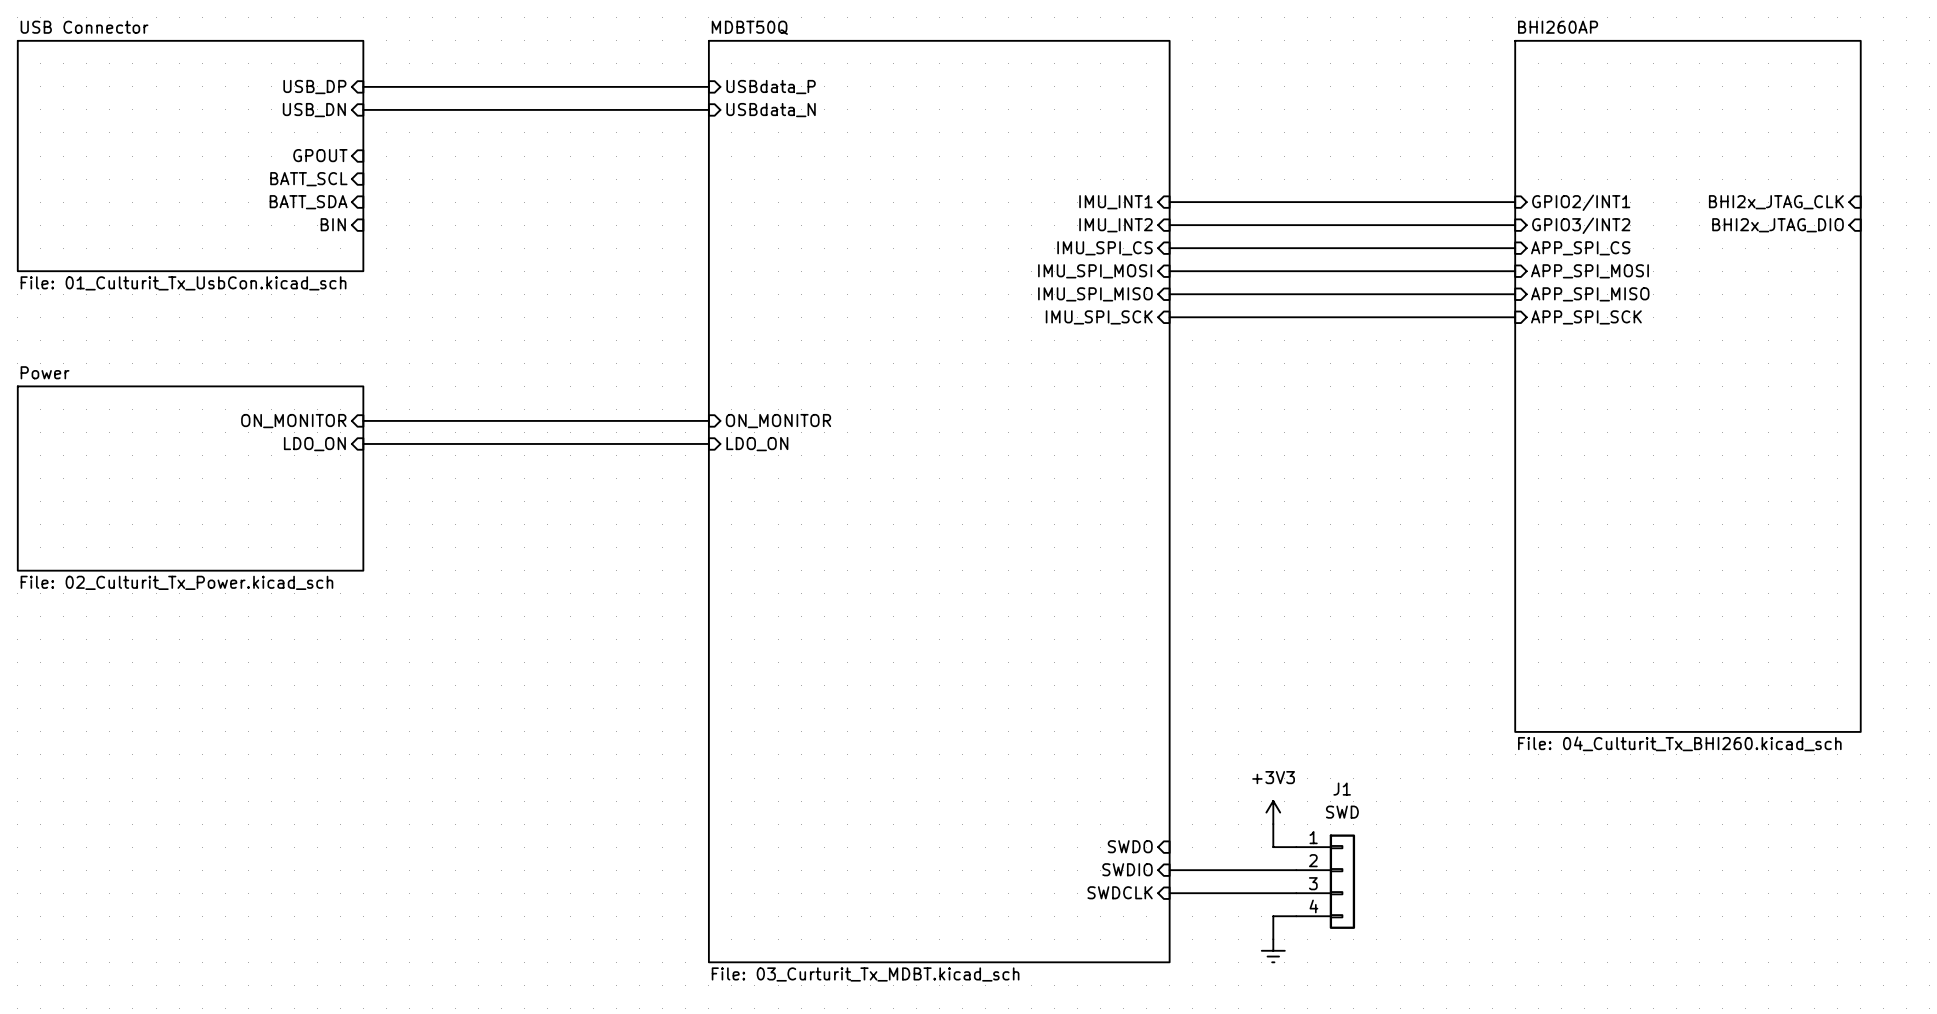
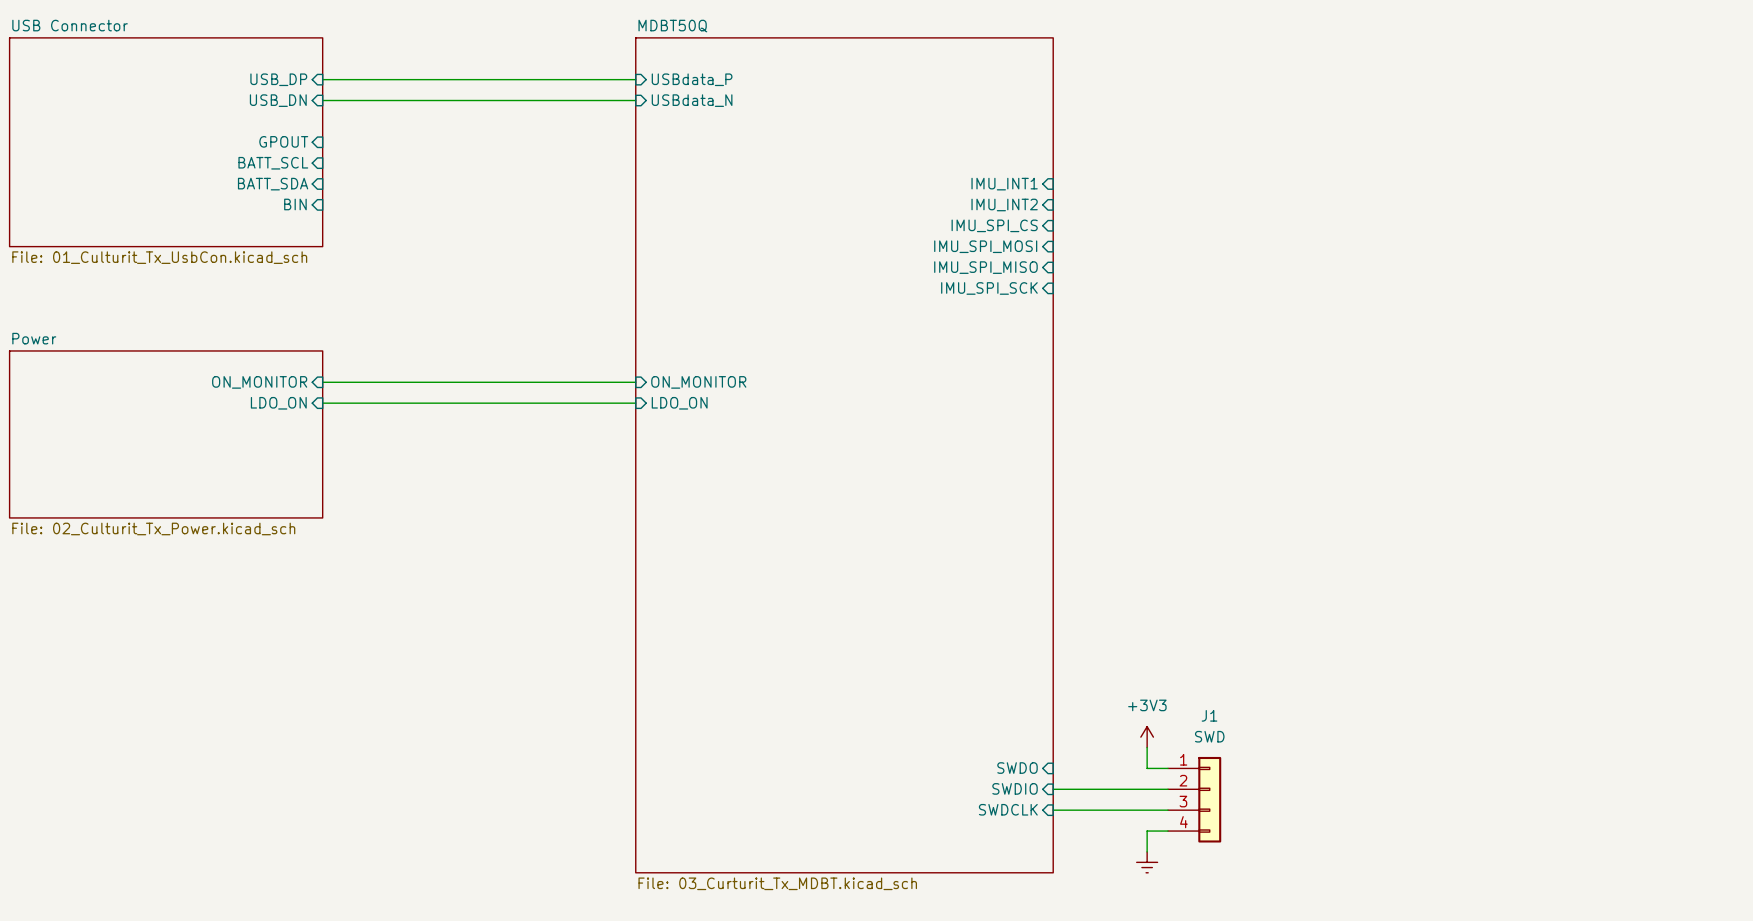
wire: (1169, 202) (1515, 202) -> none
sheet pin: GPIO2/INT1 (1581, 202) -> none
sheet pin: BHI2x_JTAG_CLK (1776, 202) -> none
wire: (1169, 225) (1515, 225) -> none
sheet pin: GPIO3/INT2 (1581, 225) -> none
sheet pin: BHI2x_JTAG_DIO (1778, 225) -> none
wire: (1169, 248) (1515, 248) -> none
sheet pin: APP_SPI_CS (1580, 248) -> none
wire: (1169, 271) (1515, 271) -> none
sheet pin: APP_SPI_MOSI (1589, 271) -> none
wire: (1169, 294) (1515, 294) -> none
sheet pin: APP_SPI_MISO (1590, 294) -> none
wire: (1169, 317) (1515, 317) -> none
sheet pin: APP_SPI_SCK (1586, 317) -> none
sheet BHI260AP: File: 04_Culturit_Tx_BHI260.kicad_sch (1687, 386) -> none

